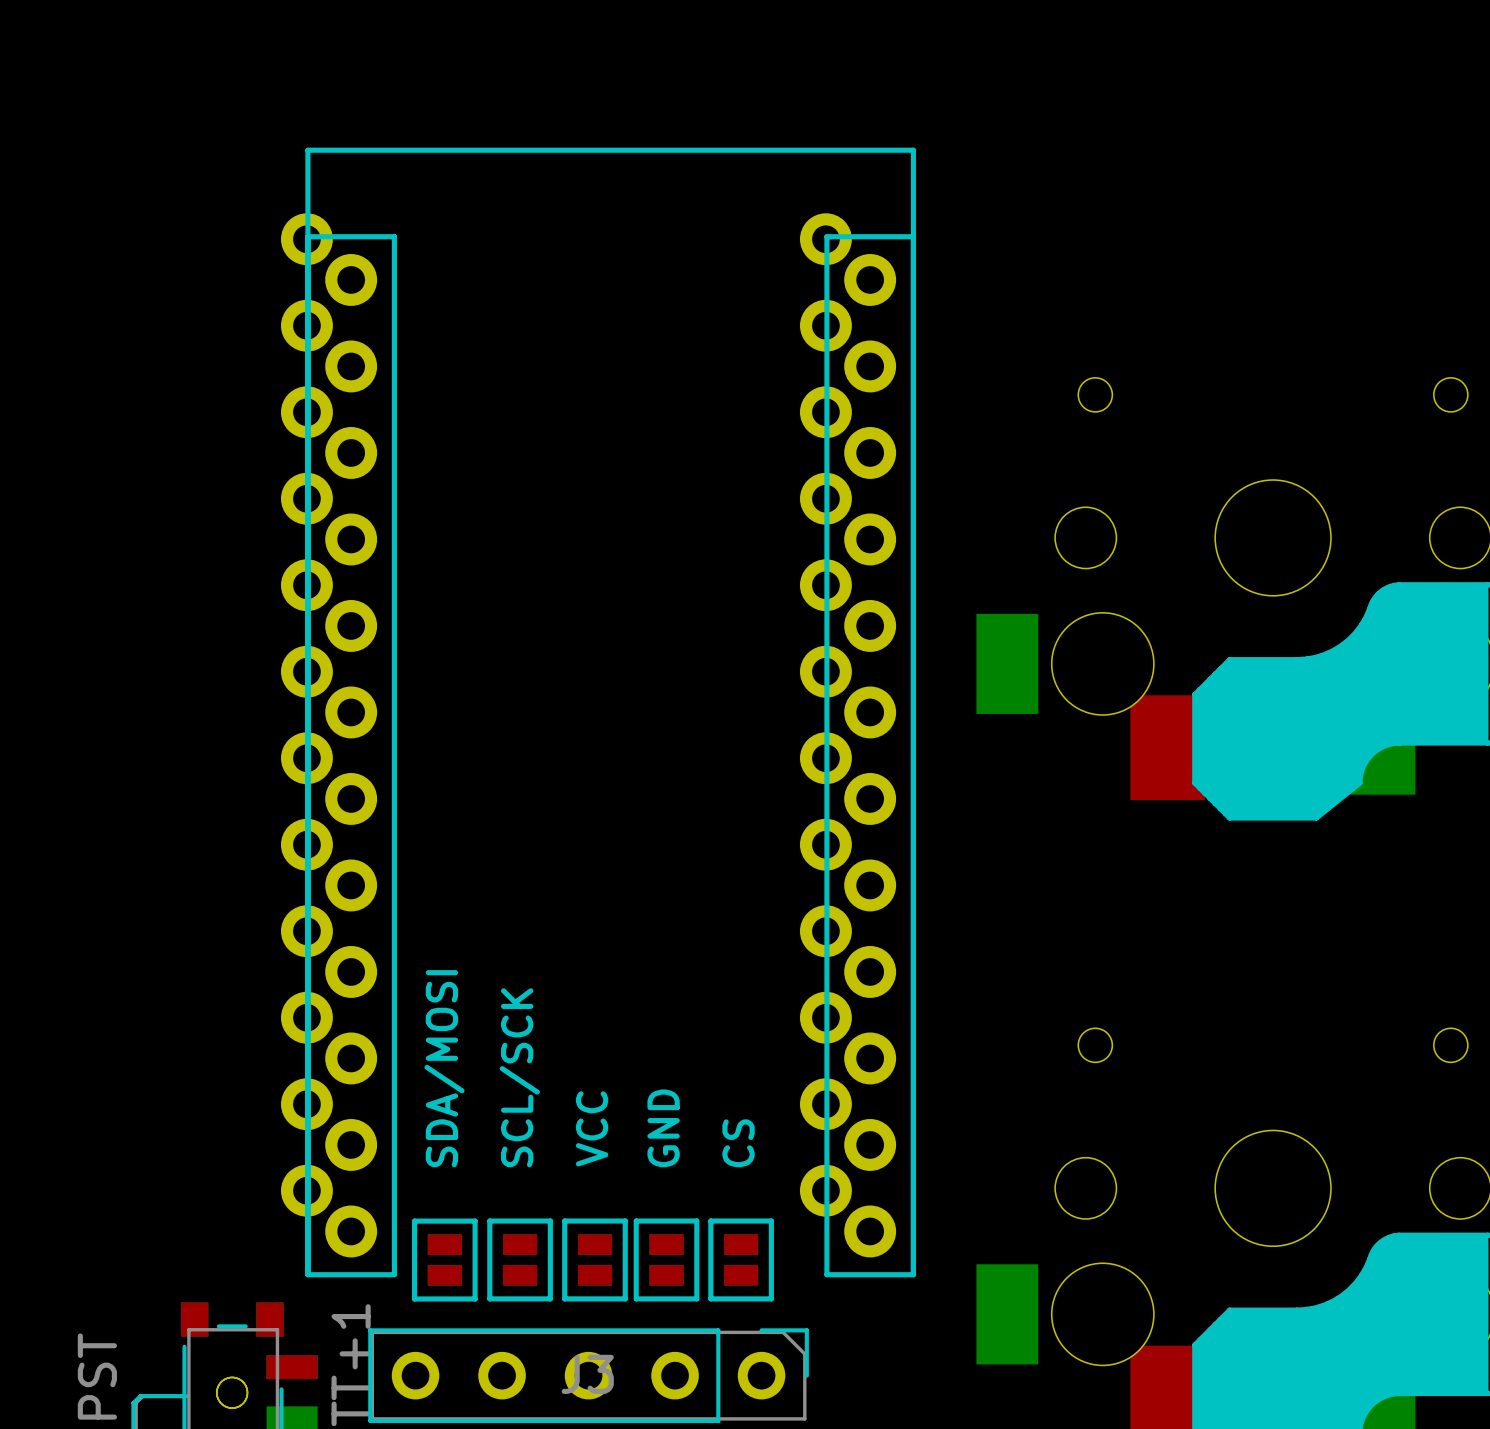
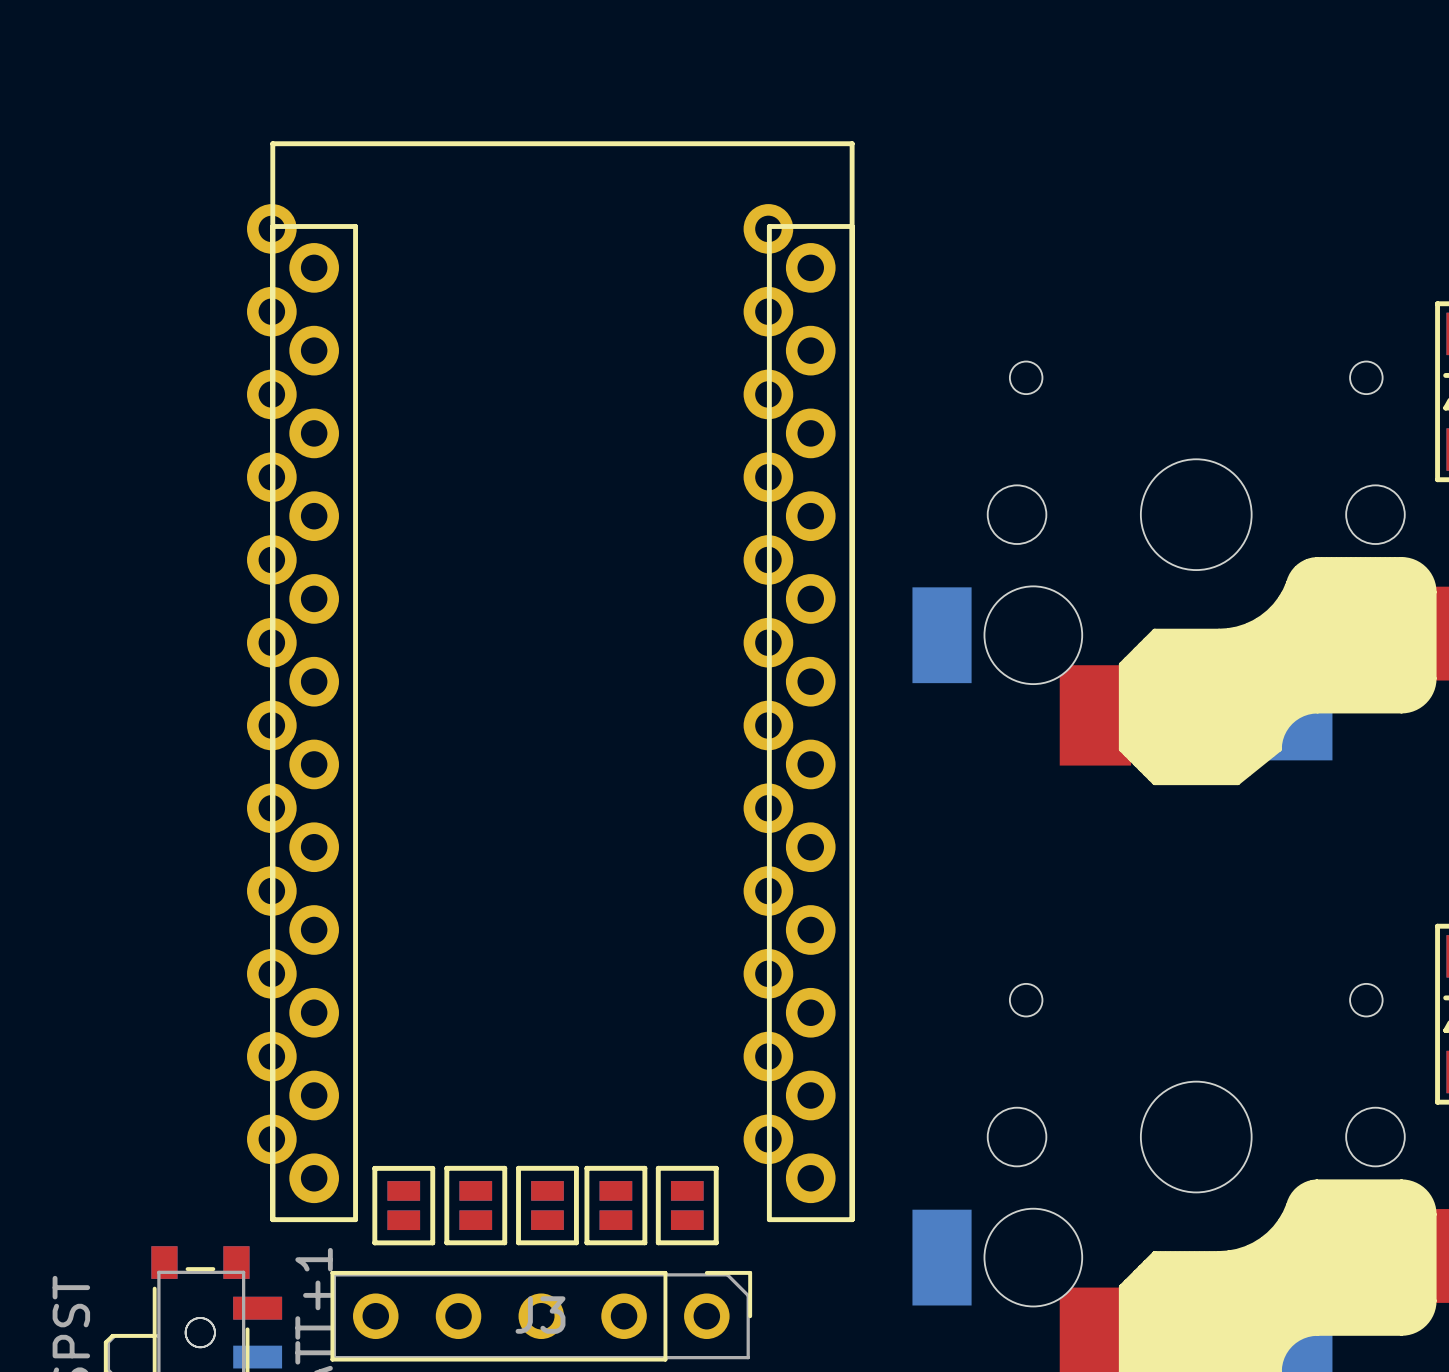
text: SDA/MOSI (444, 1068) -> none
text: SCL/SCK (519, 1077) -> none
text: VCC (592, 1128) -> none
text: GND (663, 1128) -> none
text: CS (738, 1143) -> none

